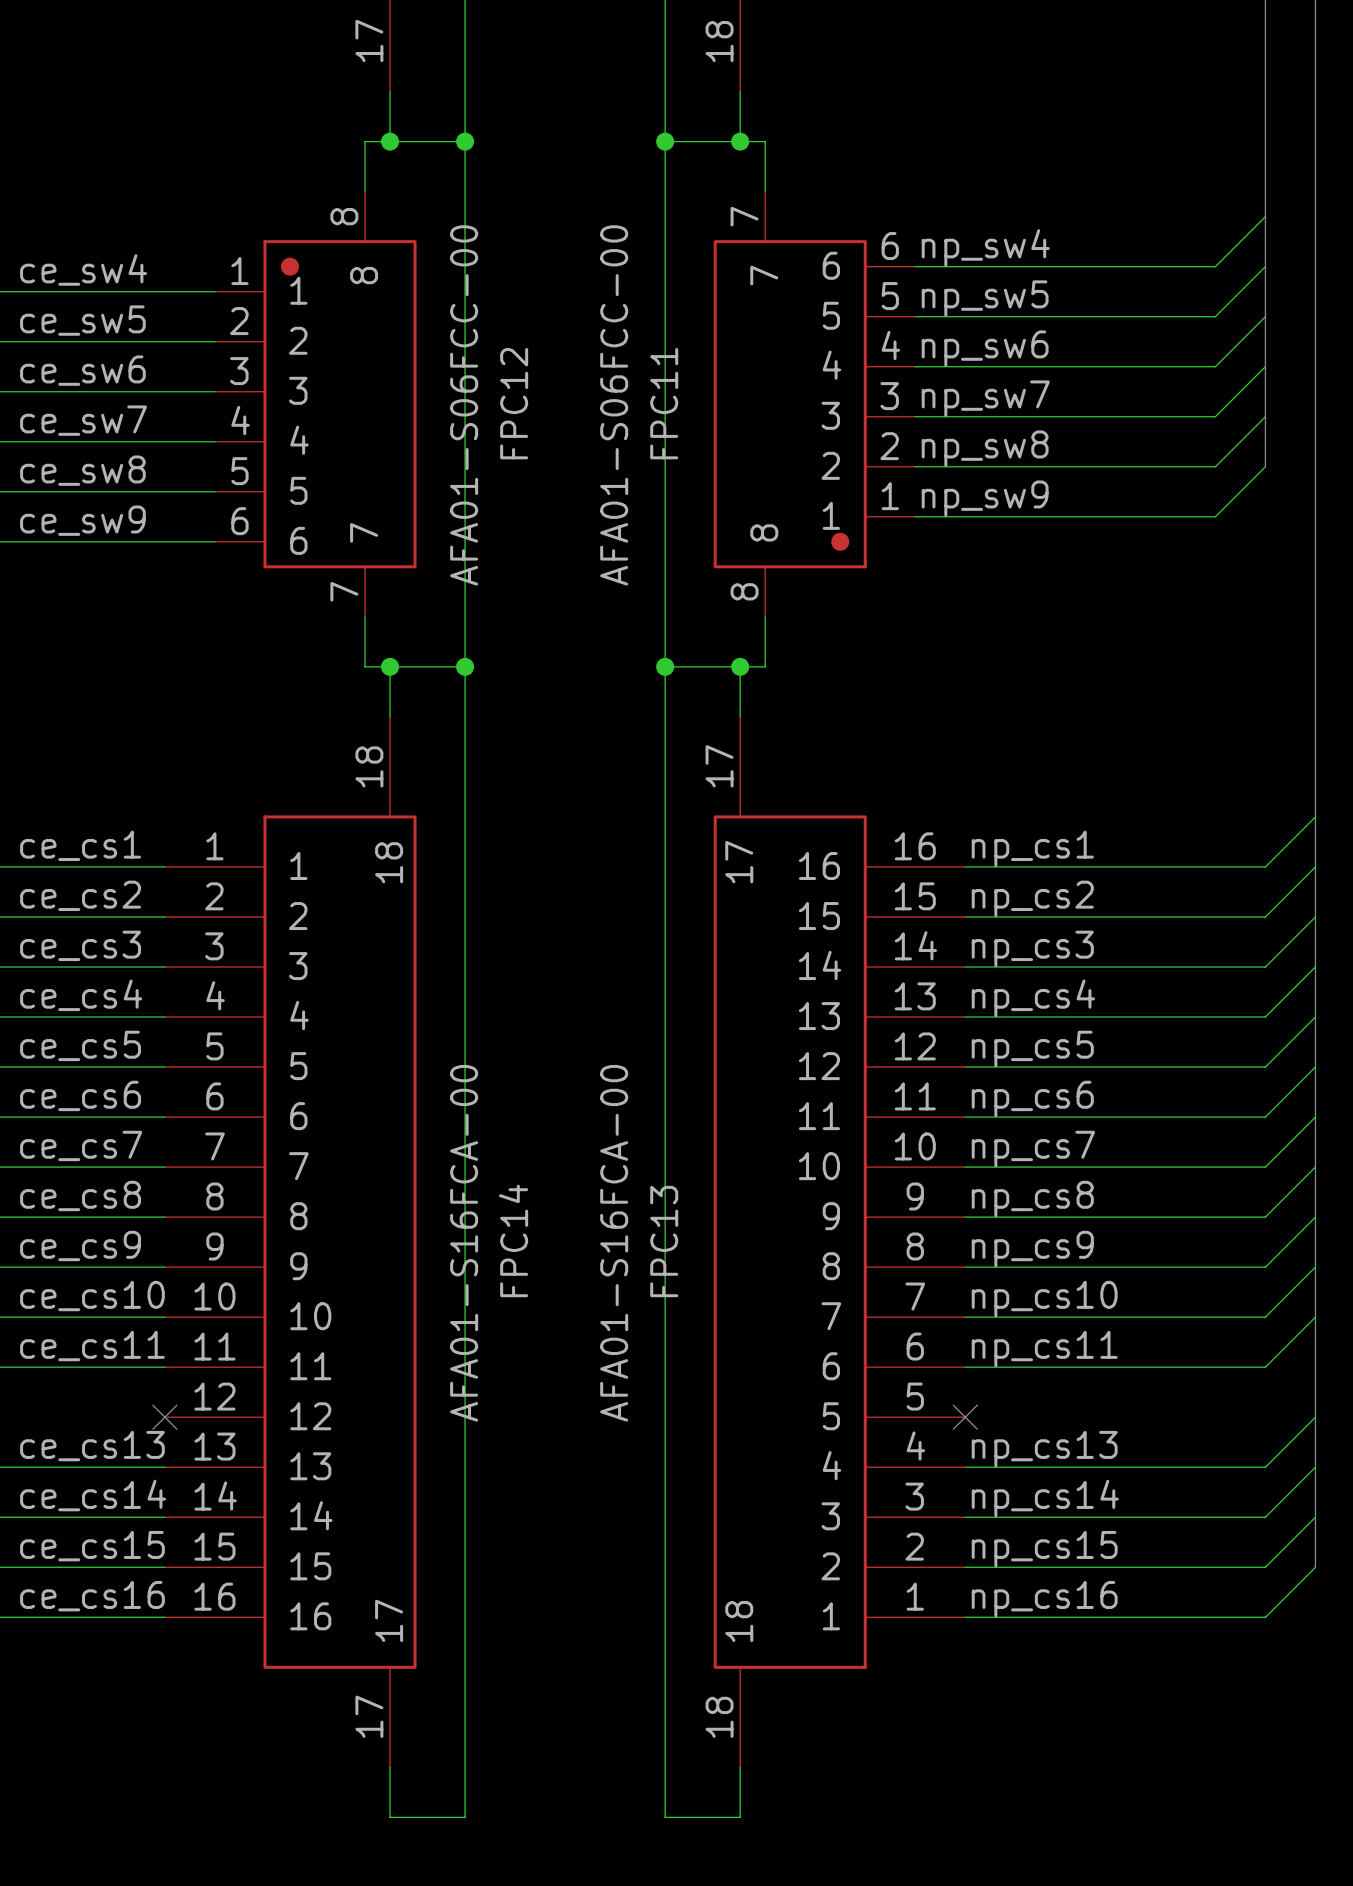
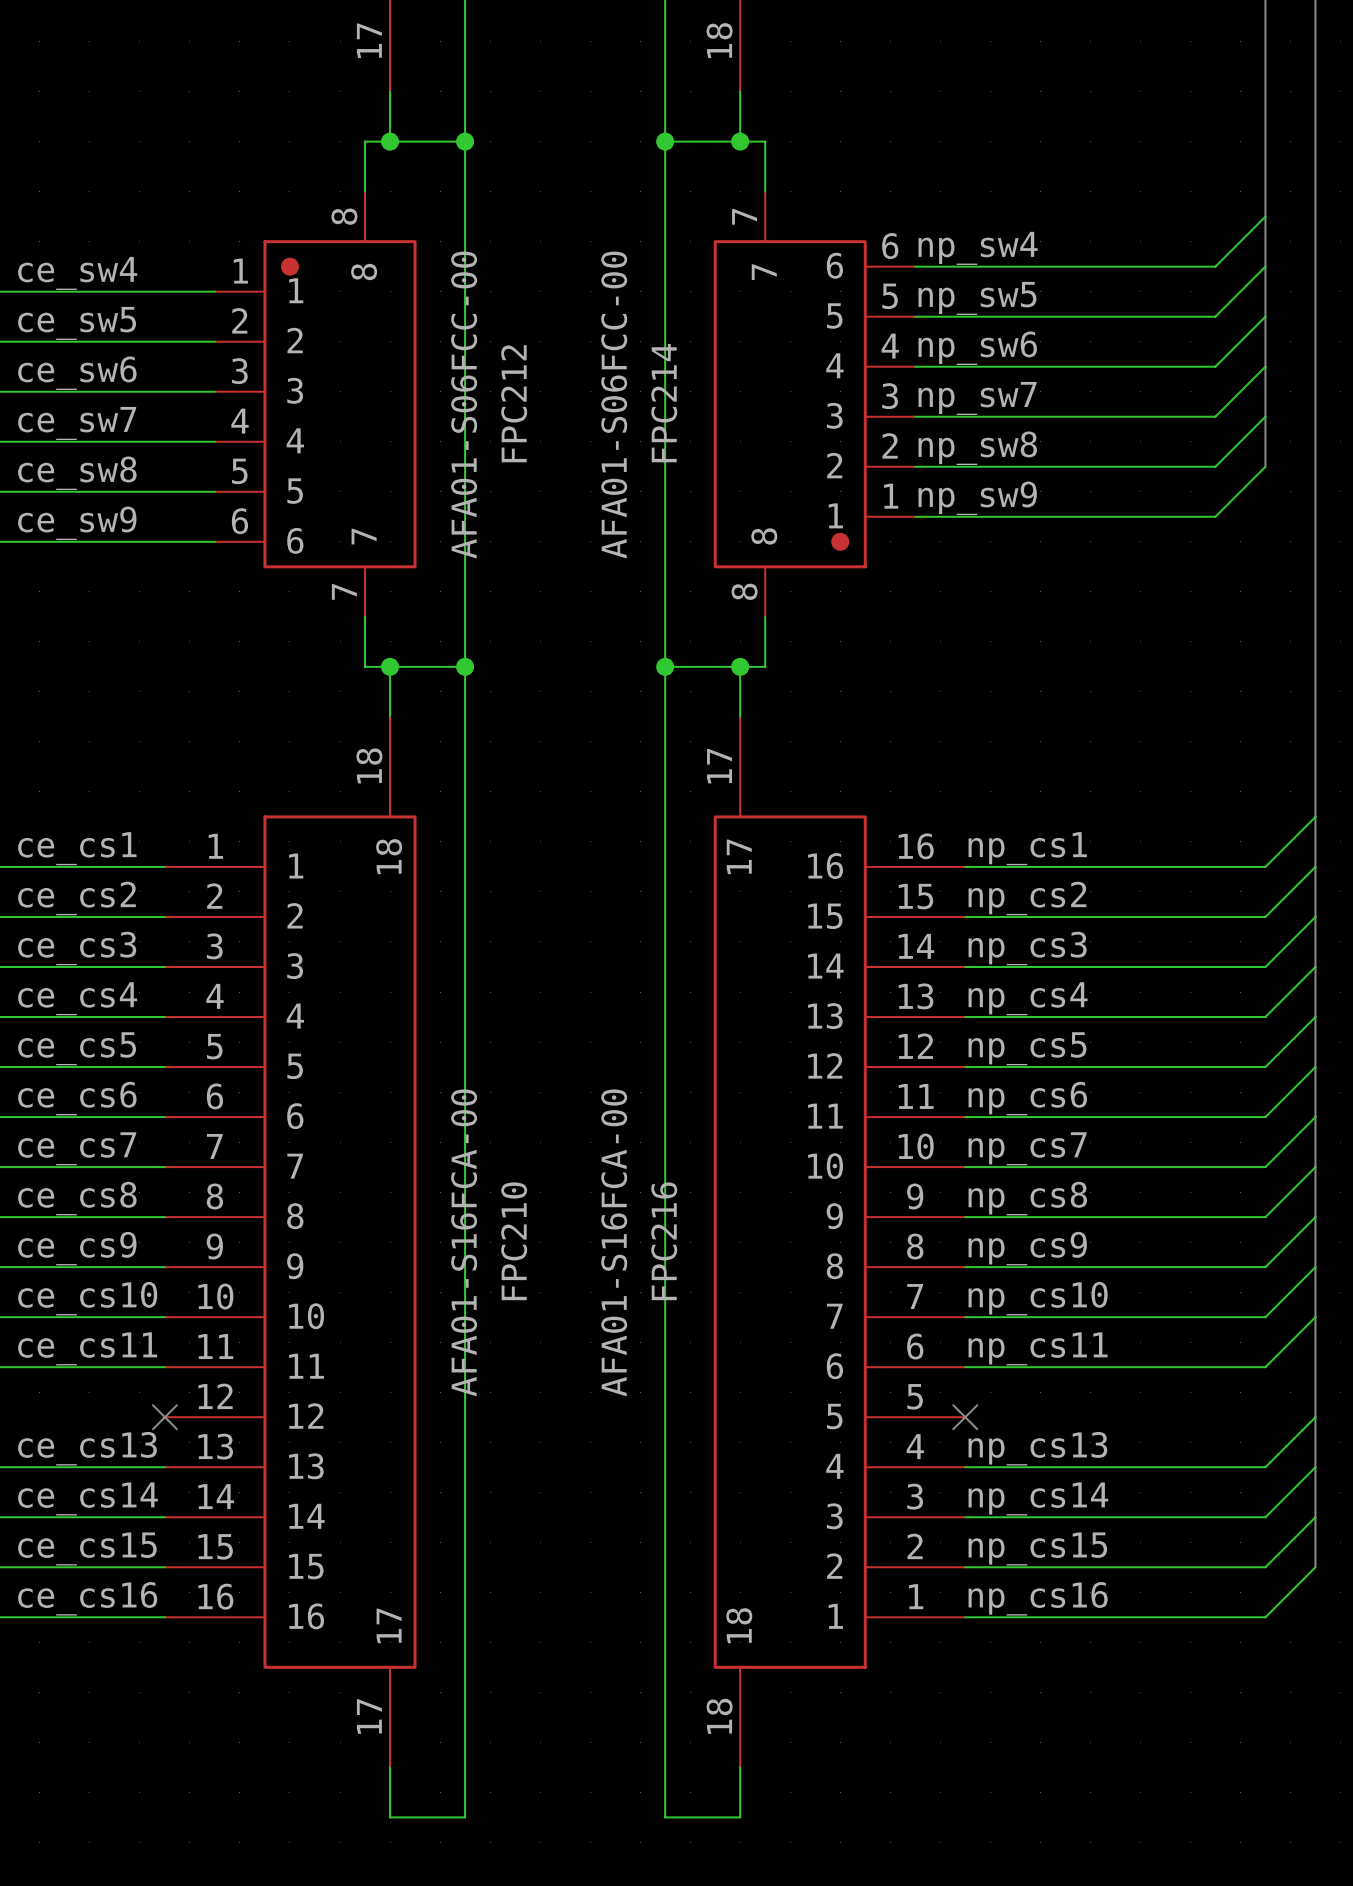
FPC12 name: FPC12 (514, 403) -> FPC212 (514, 403)
FPC11 name: FPC11 (664, 403) -> FPC214 (664, 403)
FPC14 name: FPC14 (513, 1240) -> FPC210 (514, 1241)
FPC13 name: FPC13 (664, 1241) -> FPC216 (664, 1241)

